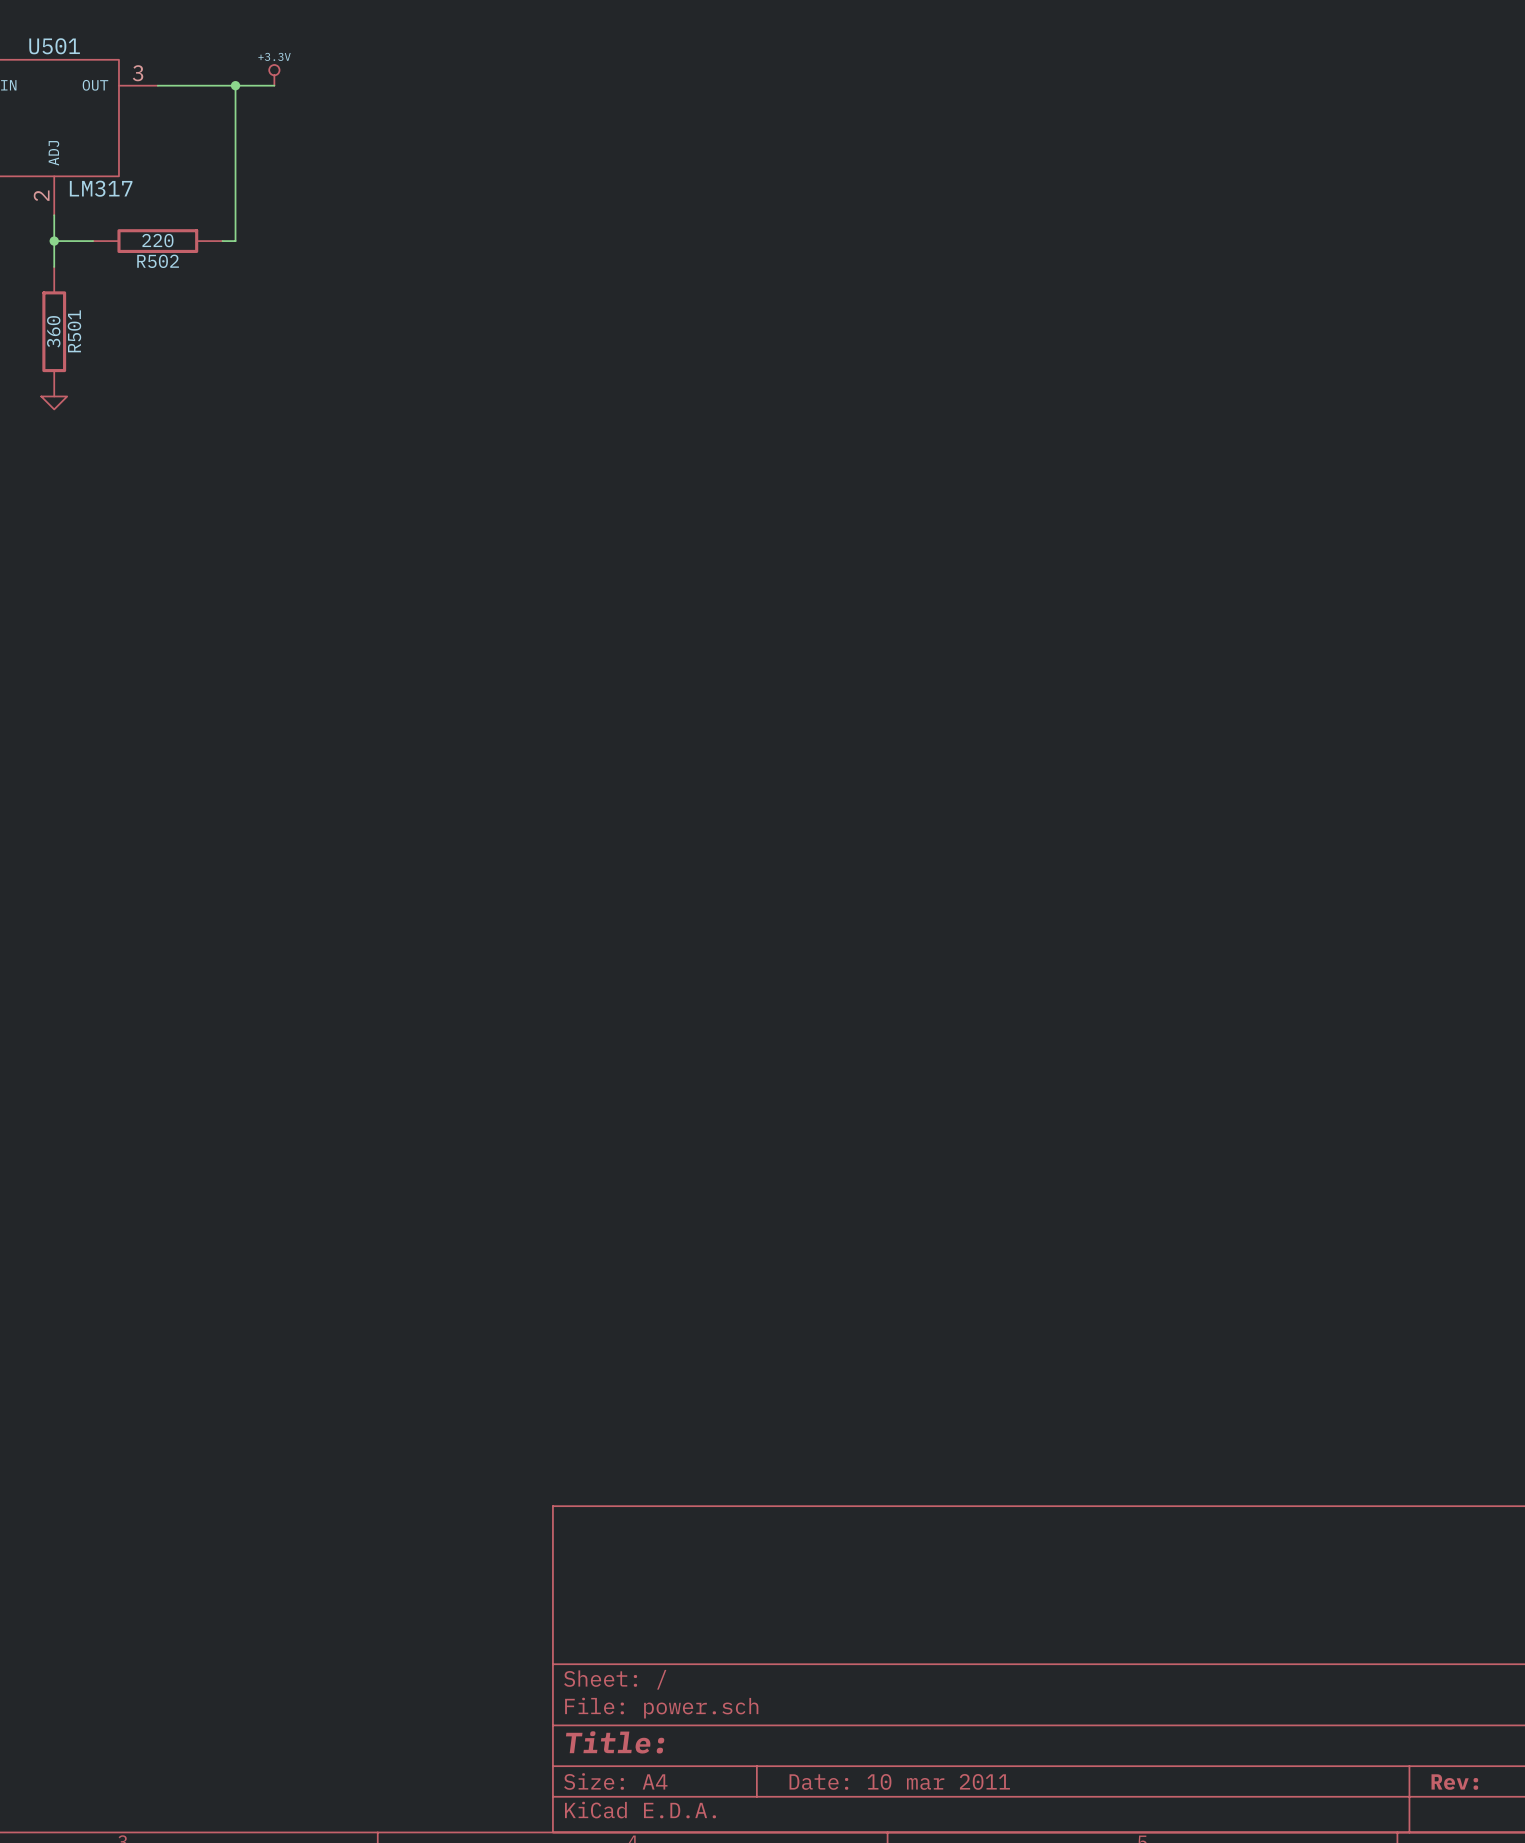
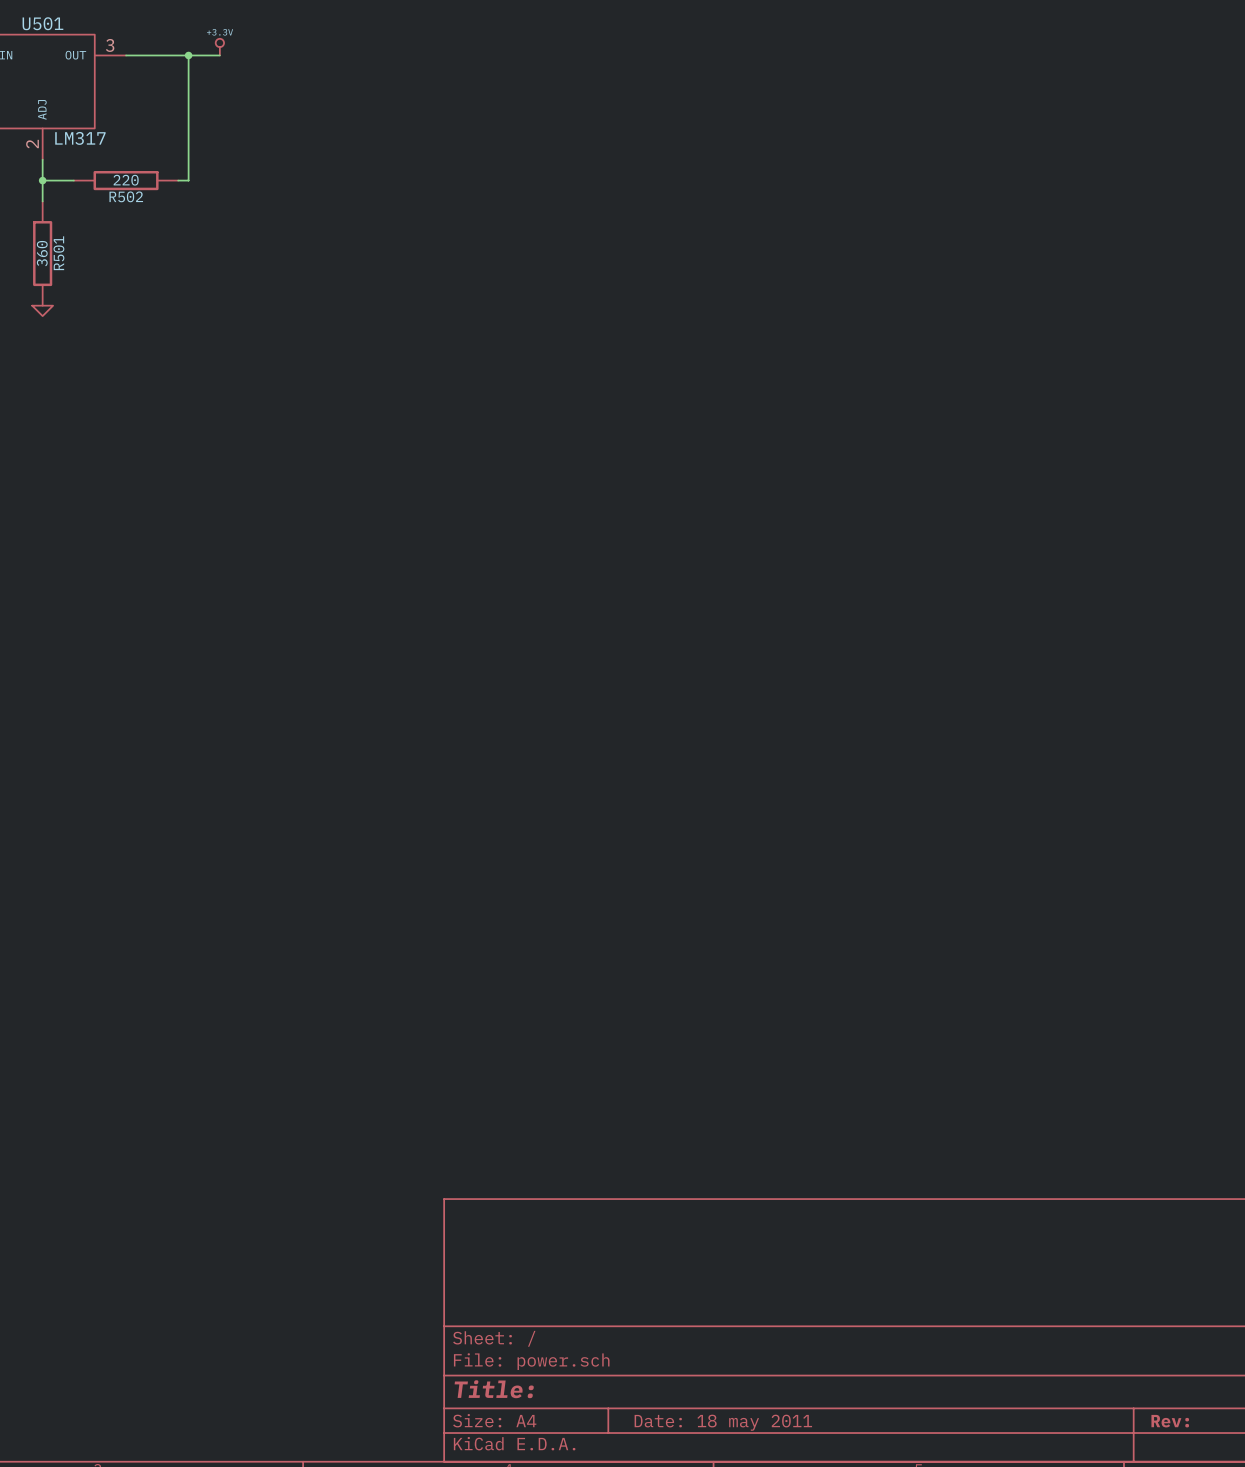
title block: Date: 10 mar 2011 (899, 1781) -> Date: 18 may 2011 (723, 1422)

